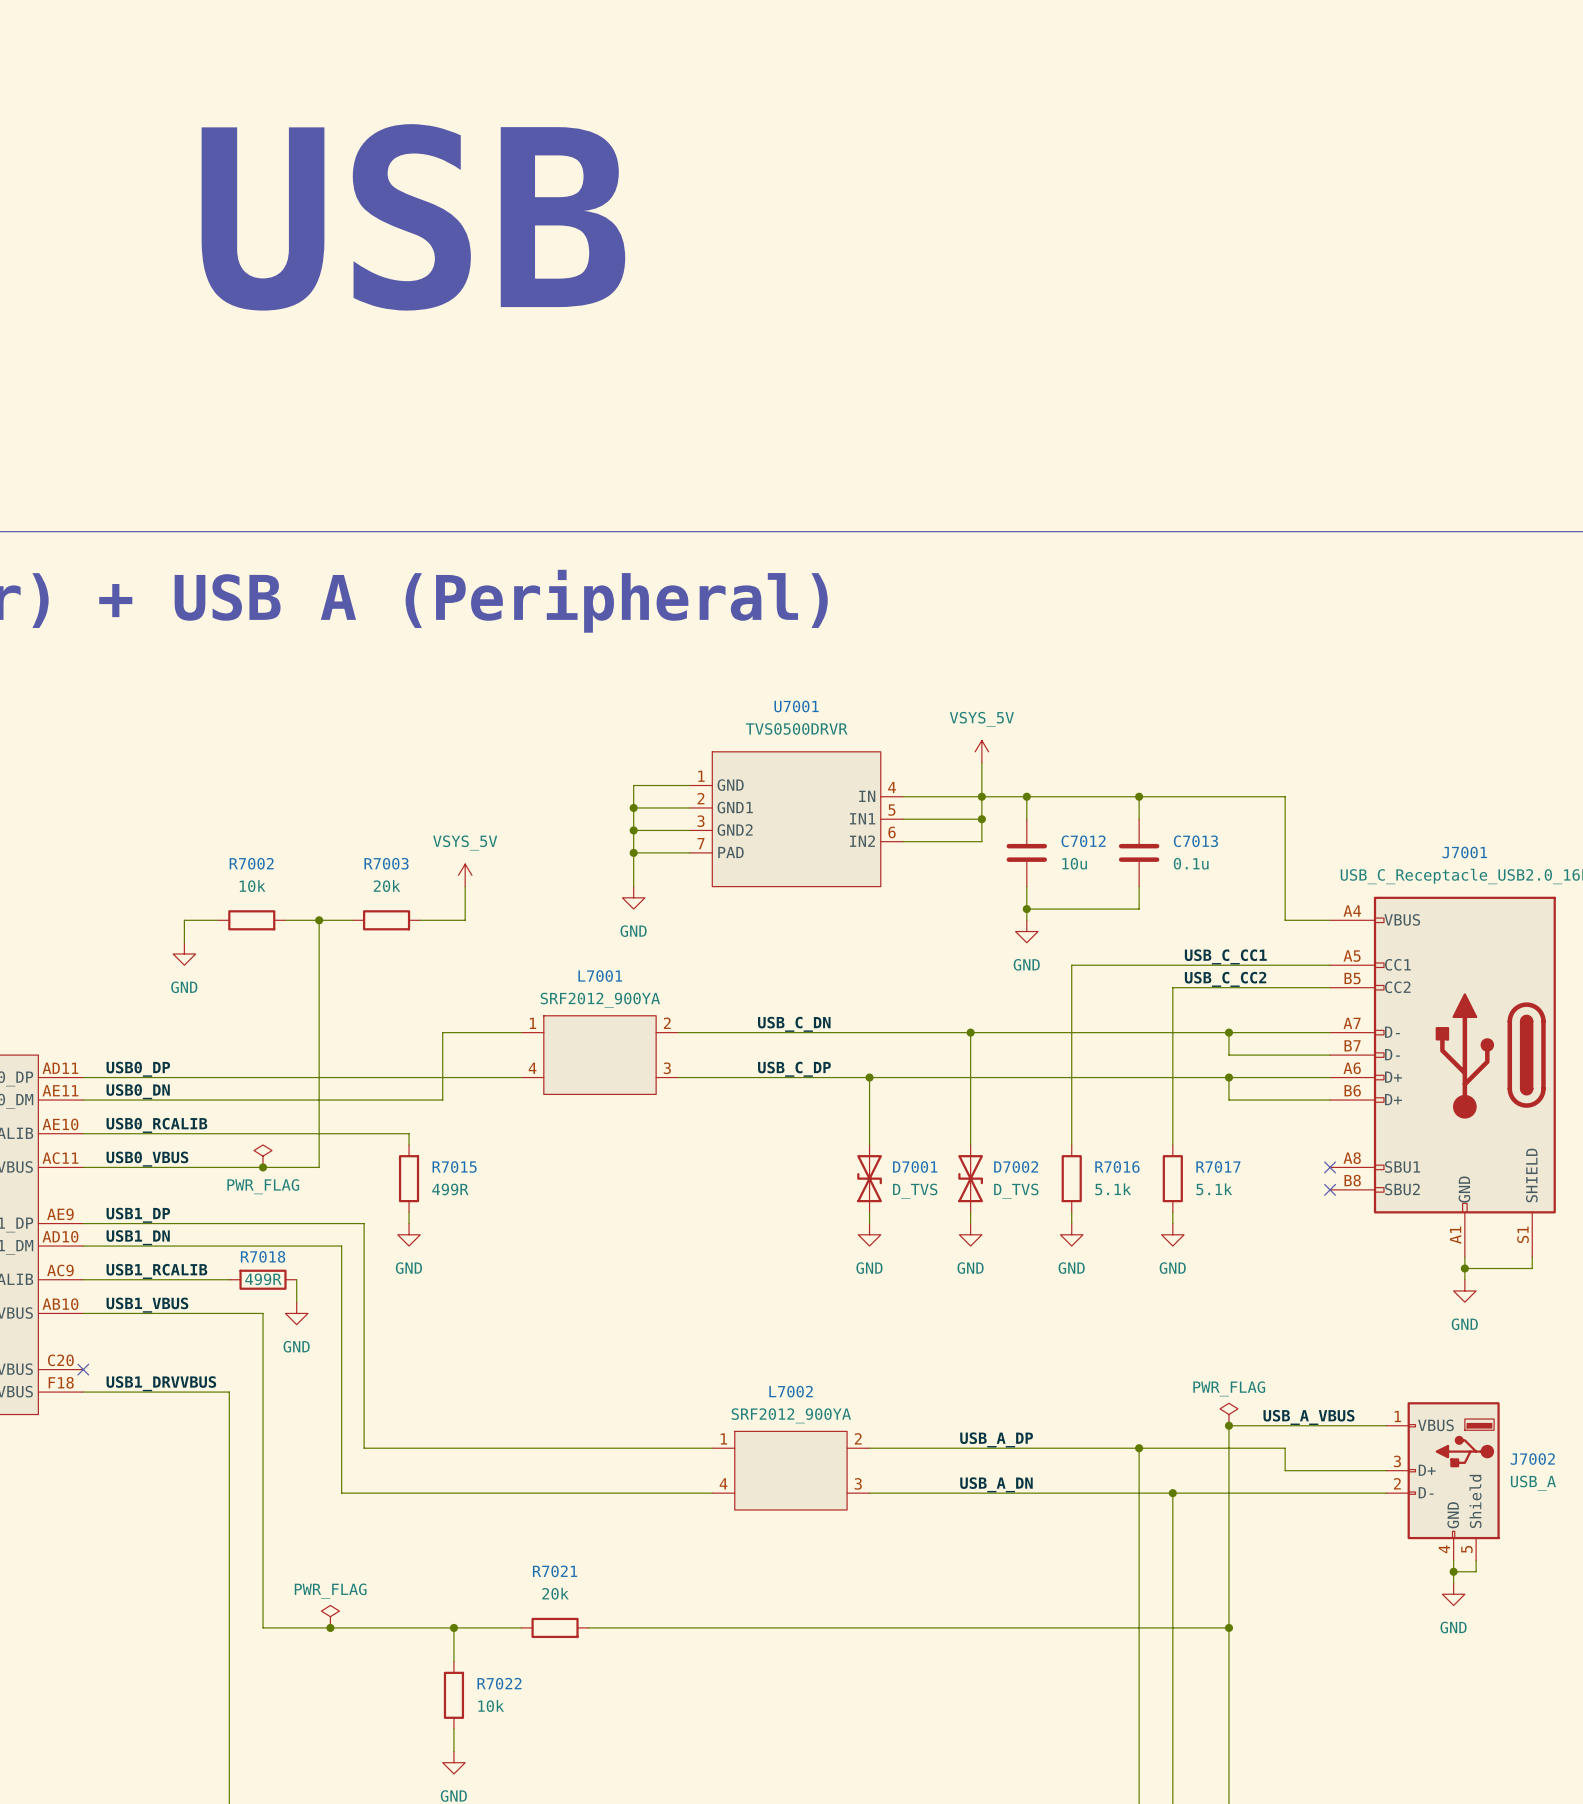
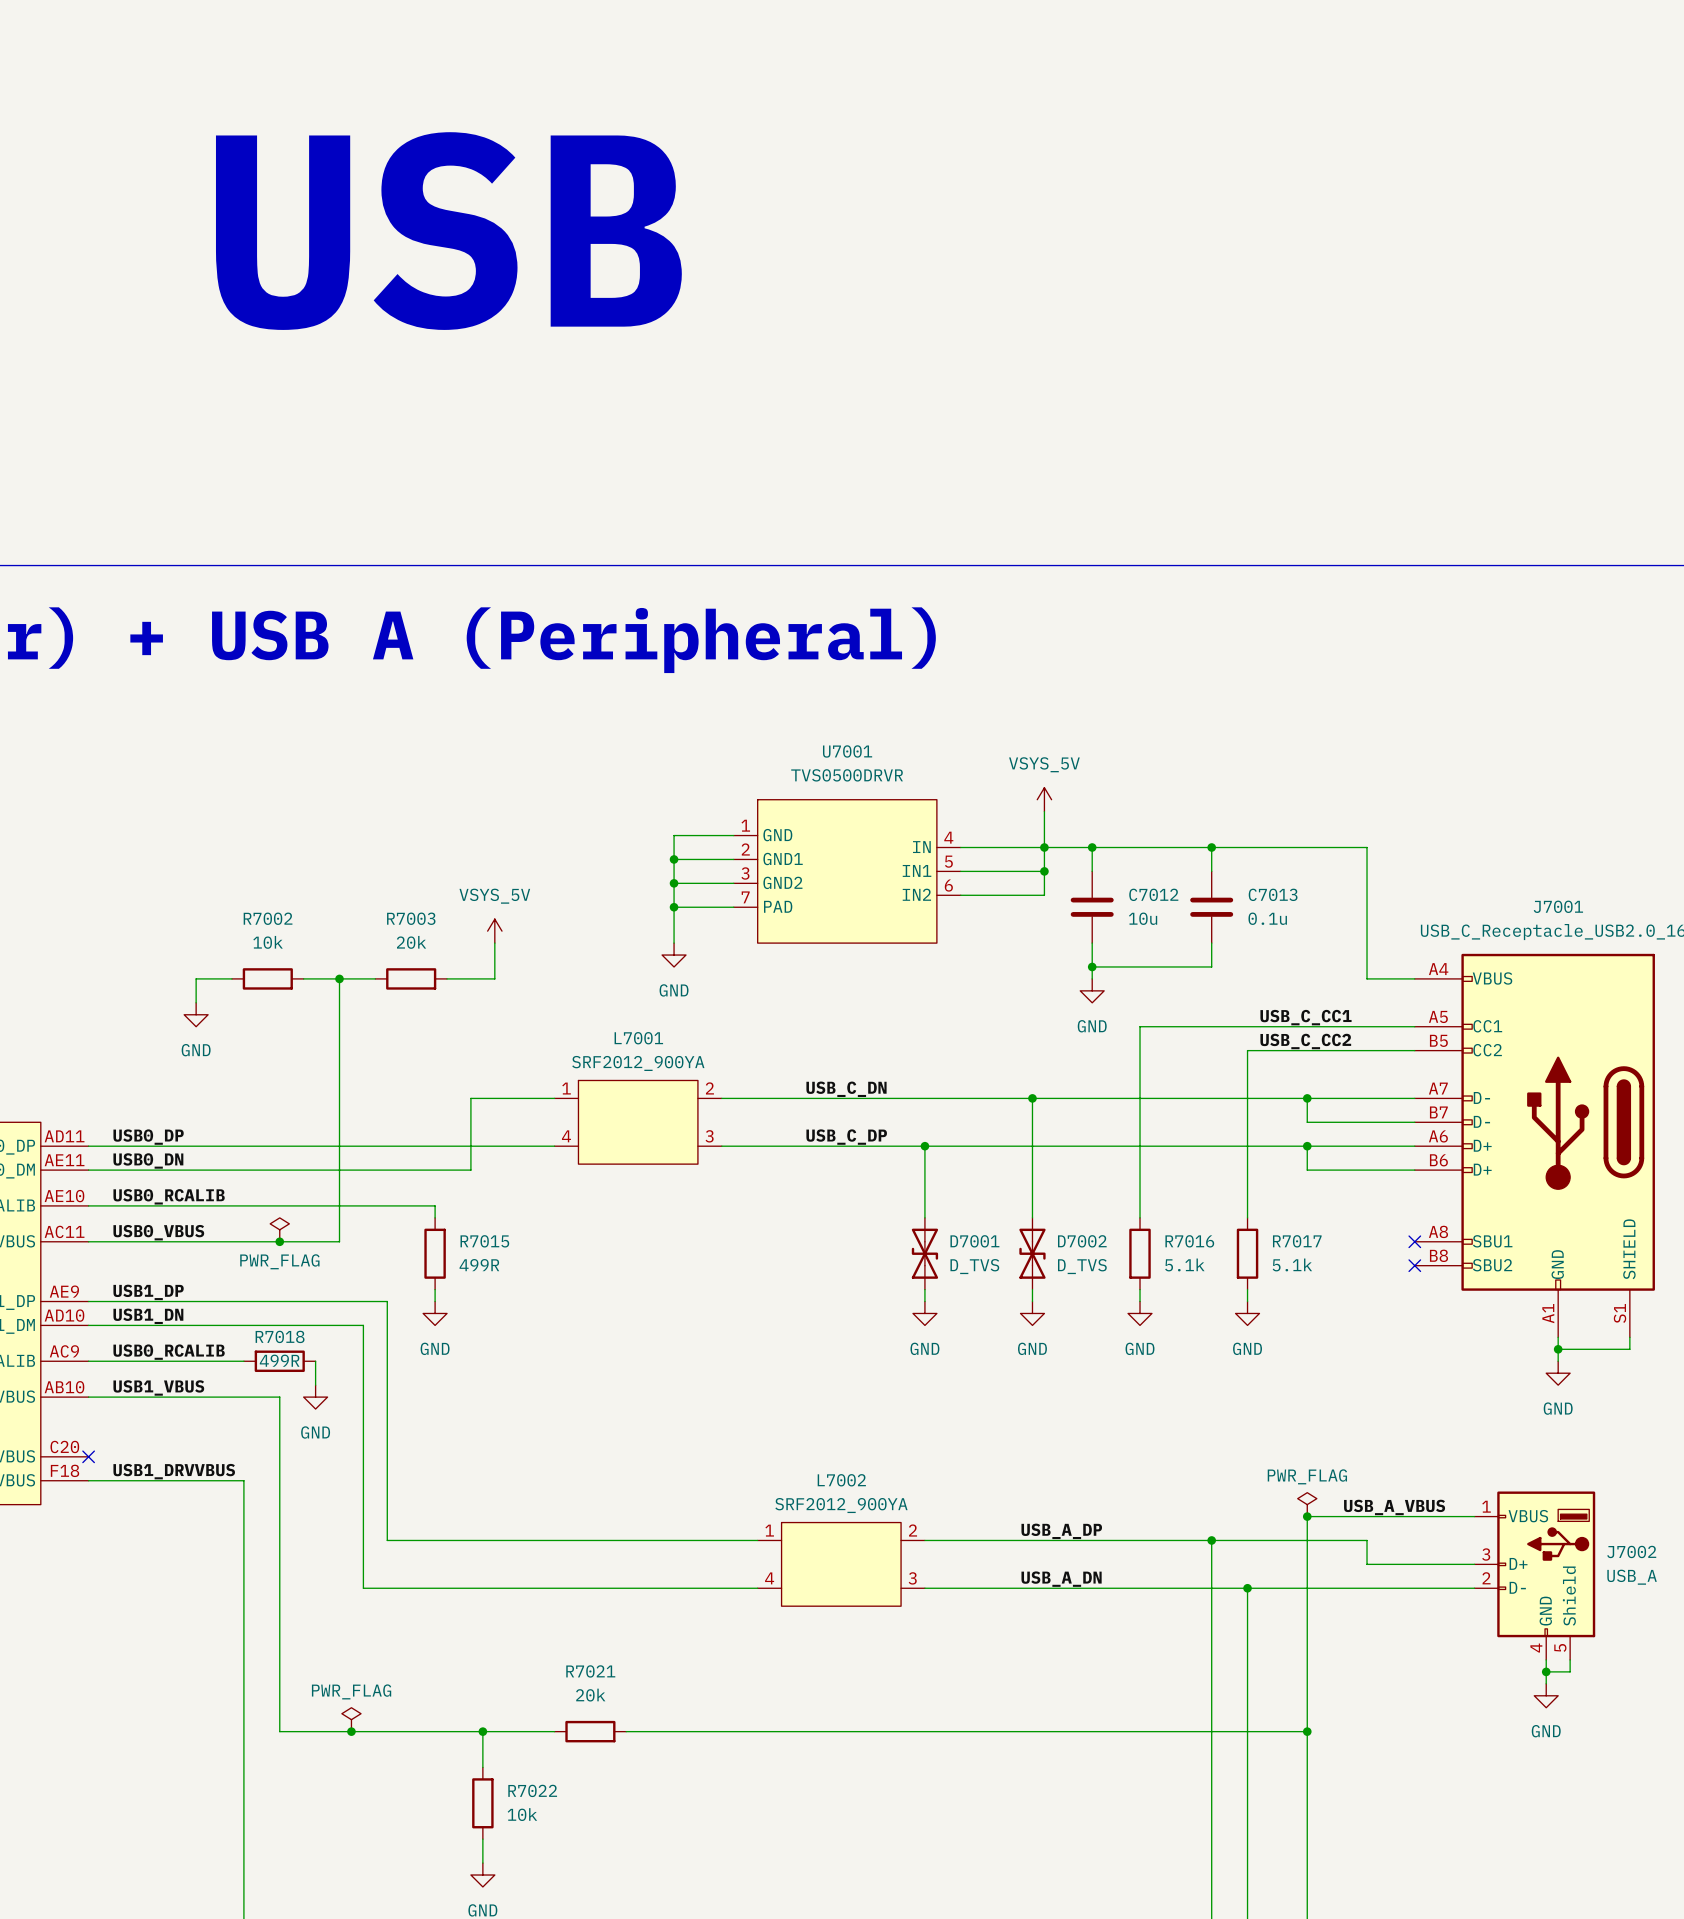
label: USB1_RCALIB (156, 1271) -> USB0_RCALIB (169, 1352)

